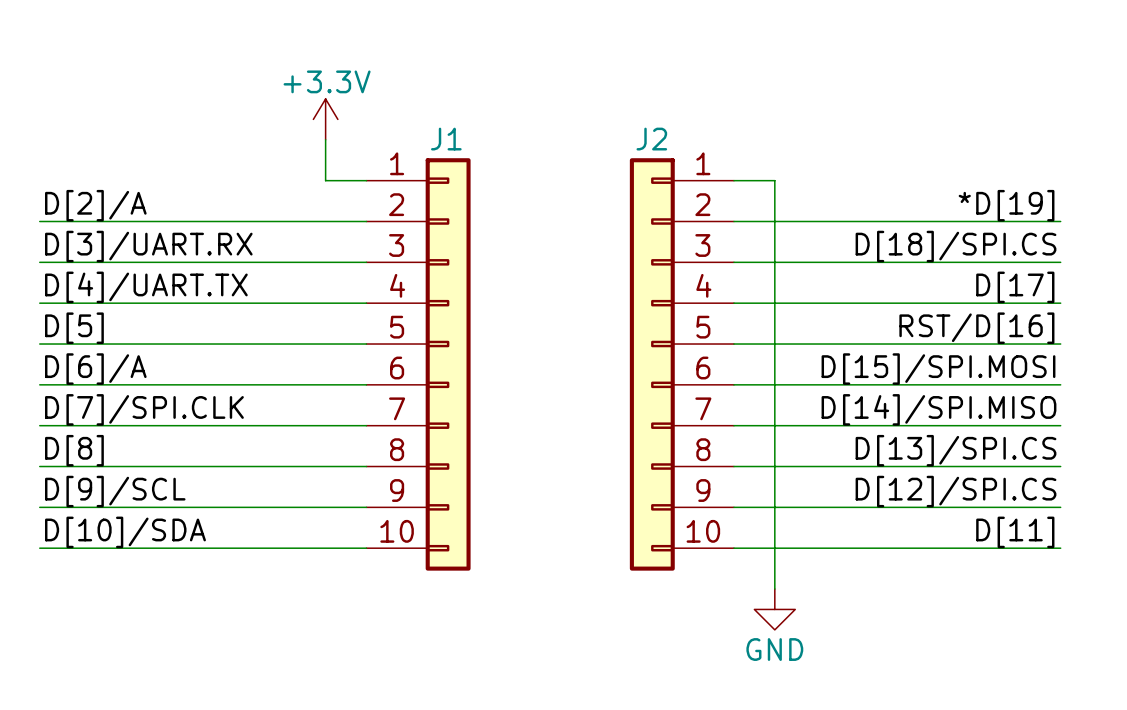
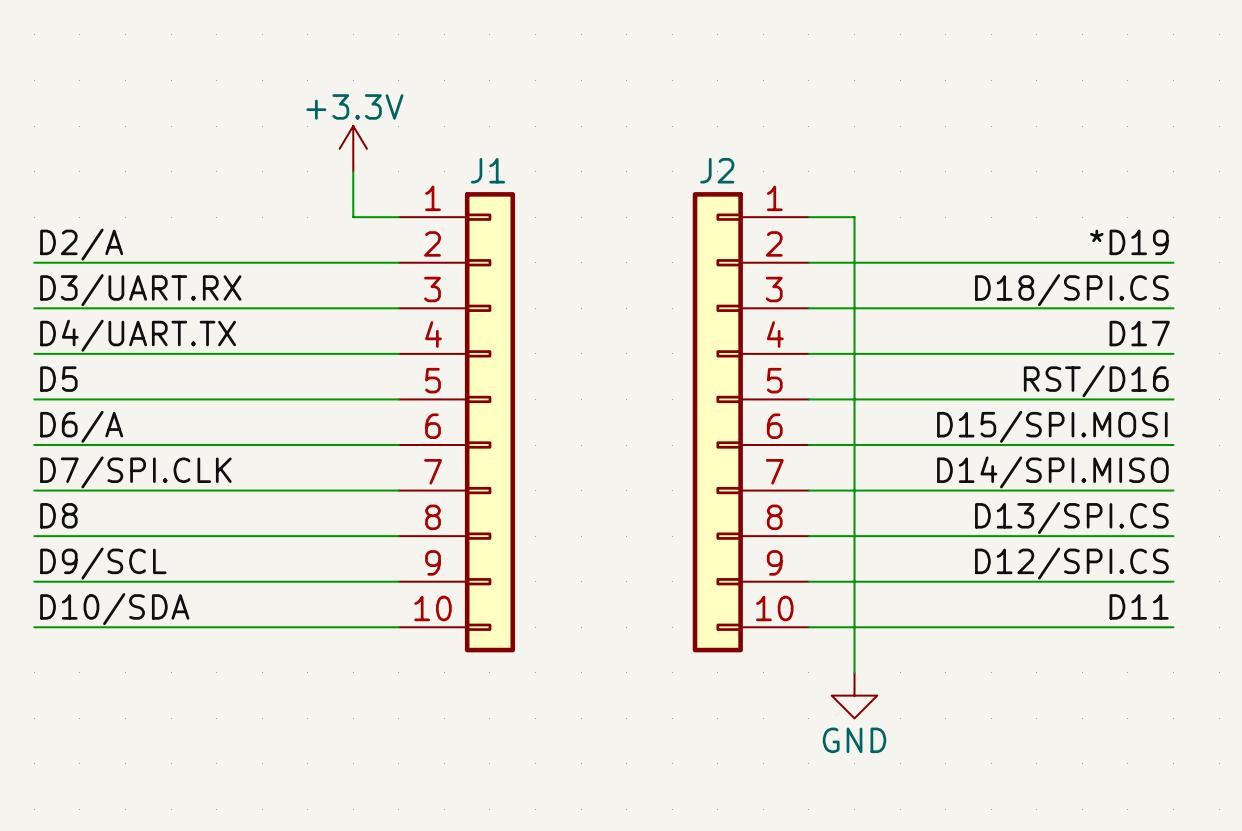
label: D[2]/A (95, 205) -> D2/A (81, 244)
label: *D[19] (1006, 205) -> *D19 (1129, 242)
label: D[3]/UART.RX (148, 246) -> D3/UART.RX (140, 290)
label: D[18]/SPI.CS (956, 246) -> D18/SPI.CS (1071, 290)
label: D[4]/UART.TX (146, 287) -> D4/UART.TX (138, 335)
label: D[17] (1015, 287) -> D17 (1139, 333)
label: D[5] (74, 328) -> D5 (58, 379)
label: RST/D[16] (976, 328) -> RST/D16 (1096, 381)
label: D[6]/A (95, 369) -> D6/A (81, 426)
label: D[15]/SPI.MOSI (938, 369) -> D15/SPI.MOSI (1052, 426)
label: D[7]/SPI.CLK (144, 409) -> D7/SPI.CLK (135, 472)
label: D[14]/SPI.MISO (938, 409) -> D14/SPI.MISO (1052, 472)
label: D[8] (74, 450) -> D8 (58, 515)
label: D[13]/SPI.CS (956, 450) -> D13/SPI.CS (1071, 517)
label: D[9]/SCL (115, 491) -> D9/SCL (103, 563)
label: D[12]/SPI.CS (956, 491) -> D12/SPI.CS (1071, 563)
label: D[10]/SDA (125, 532) -> D10/SDA (114, 609)
label: D[11] (1015, 532) -> D11 (1139, 606)

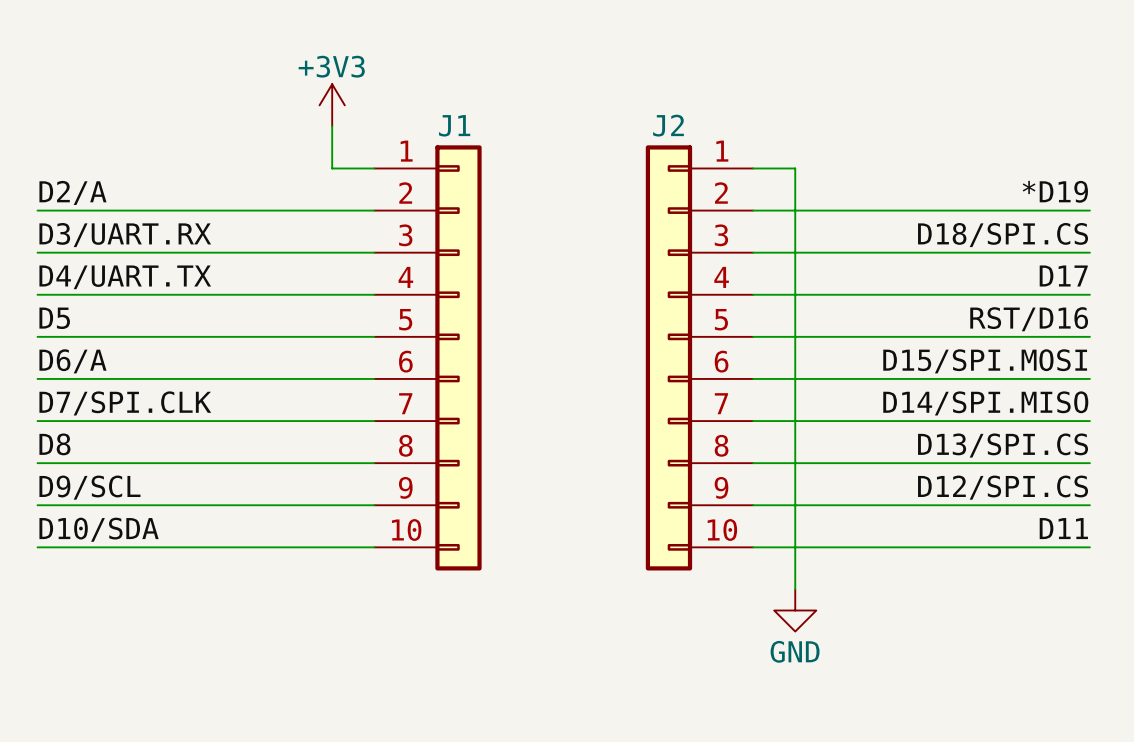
power symbol: +3.3V (353, 148) -> +3V3 (332, 105)

